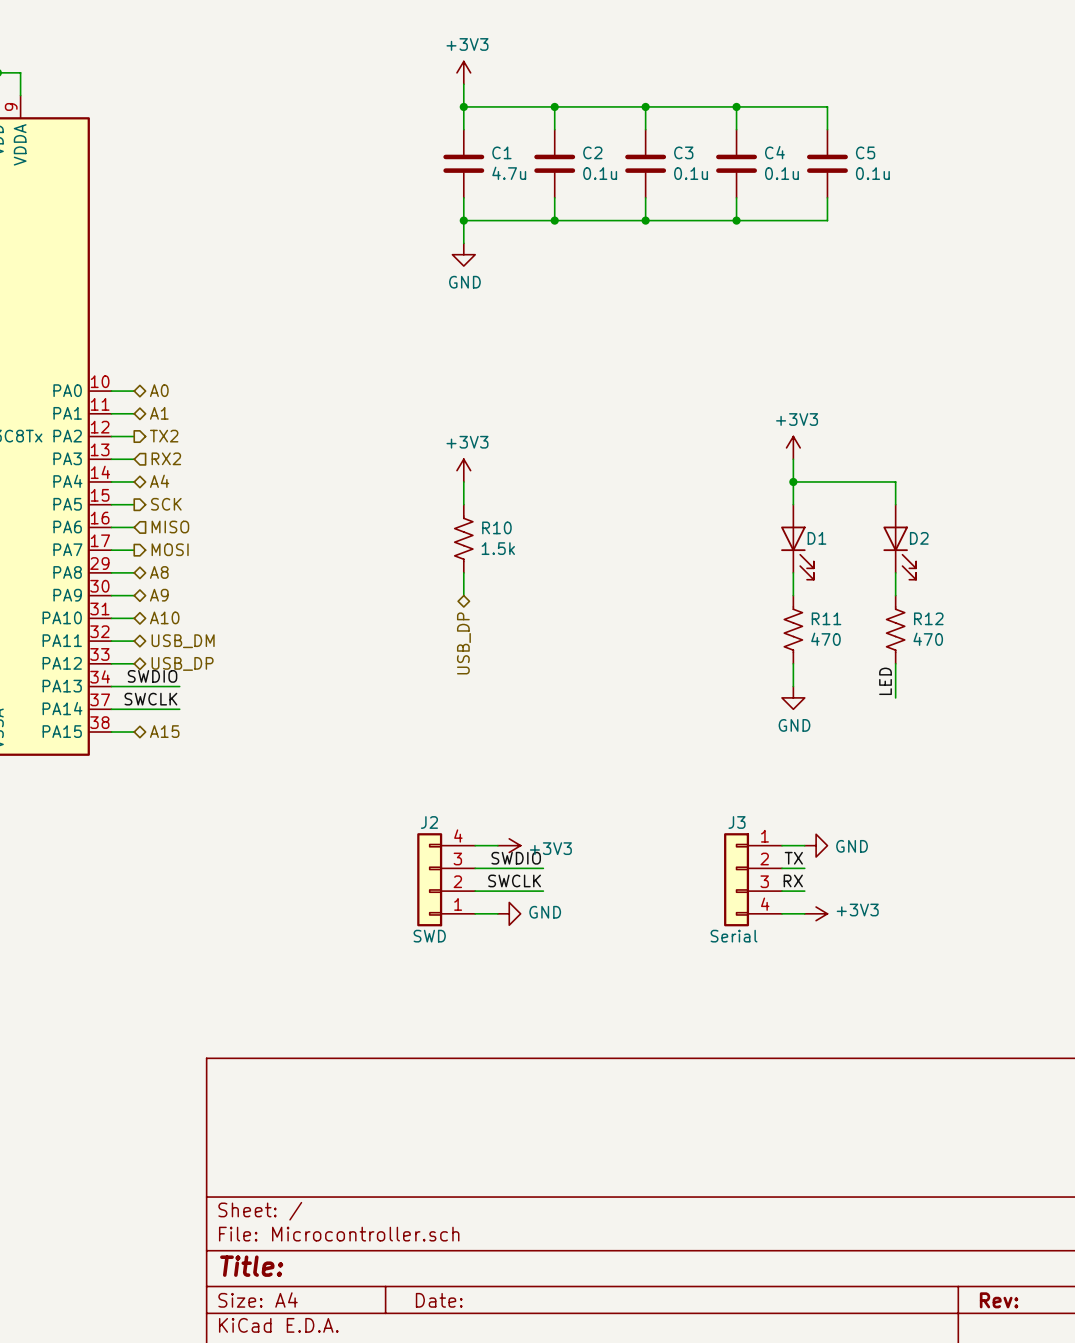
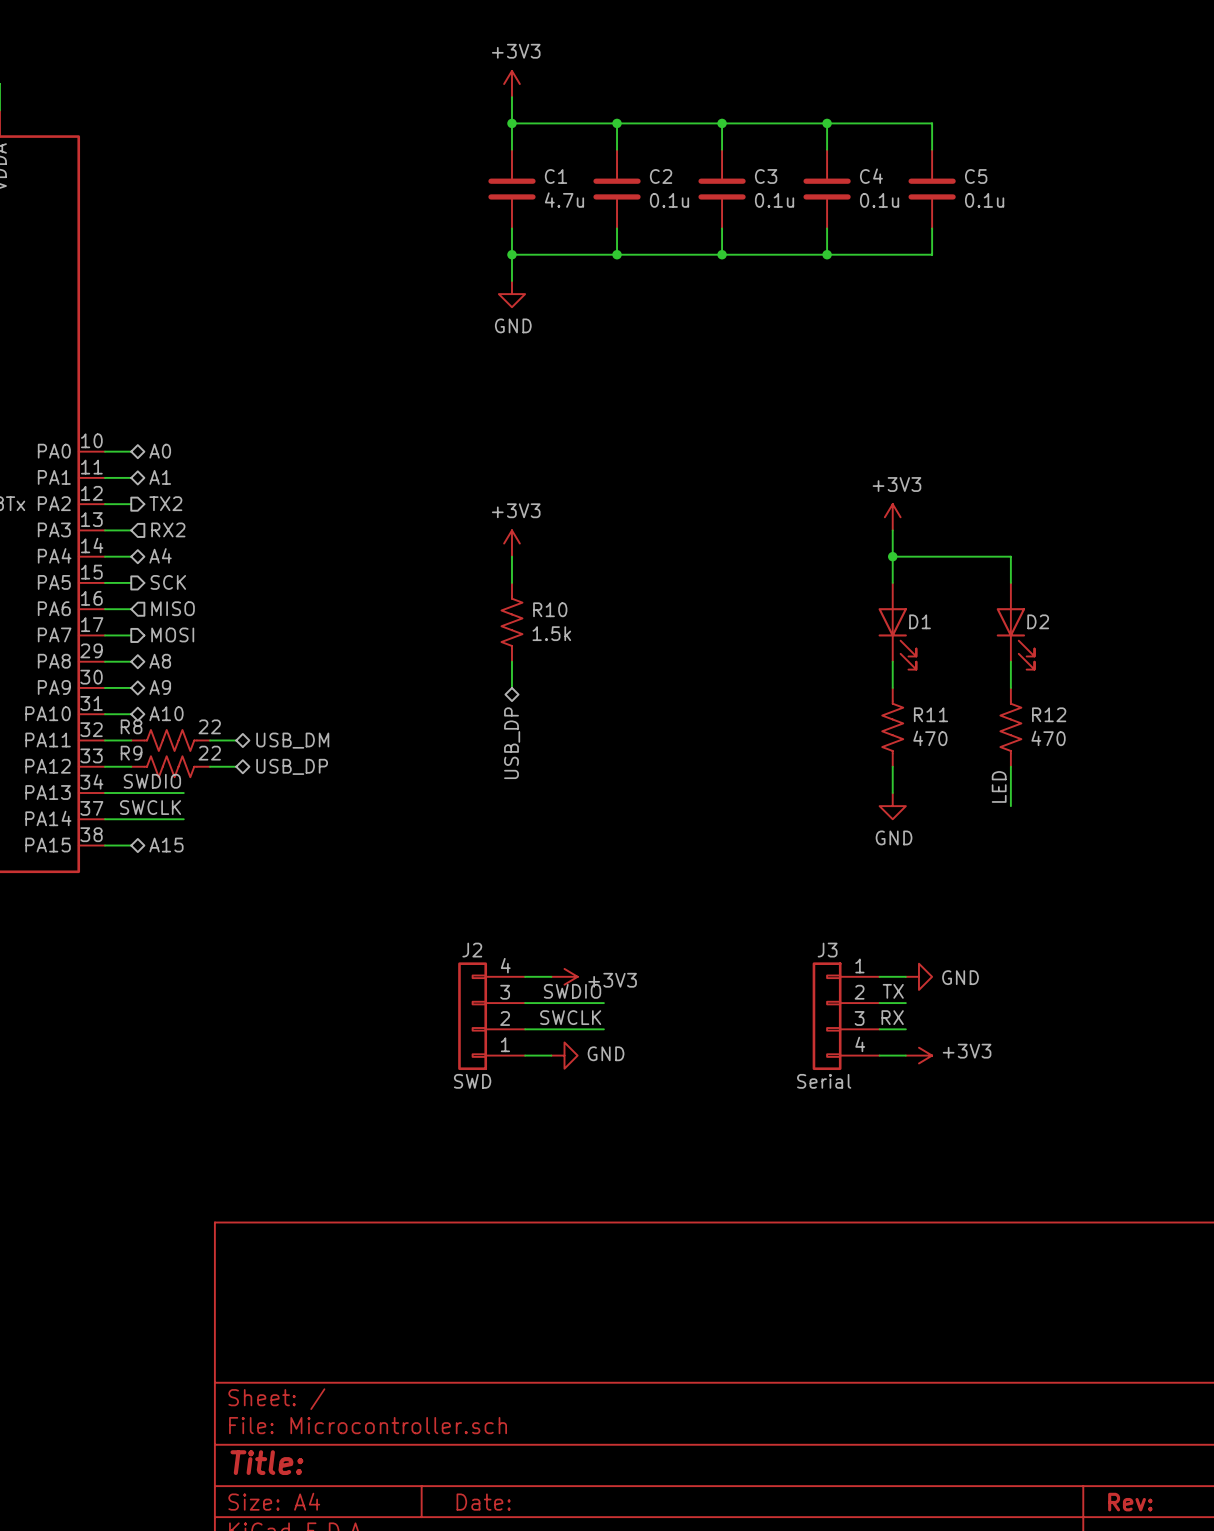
R8: none -> 22 (170, 740)
hierarchical label position: USB_DM (183, 641) -> USB_DM (292, 740)
wire: none -> (210, 740) (236, 740)
R9: none -> 22 (170, 766)
hierarchical label position: USB_DP (182, 663) -> USB_DP (292, 766)
wire: none -> (210, 766) (236, 766)

